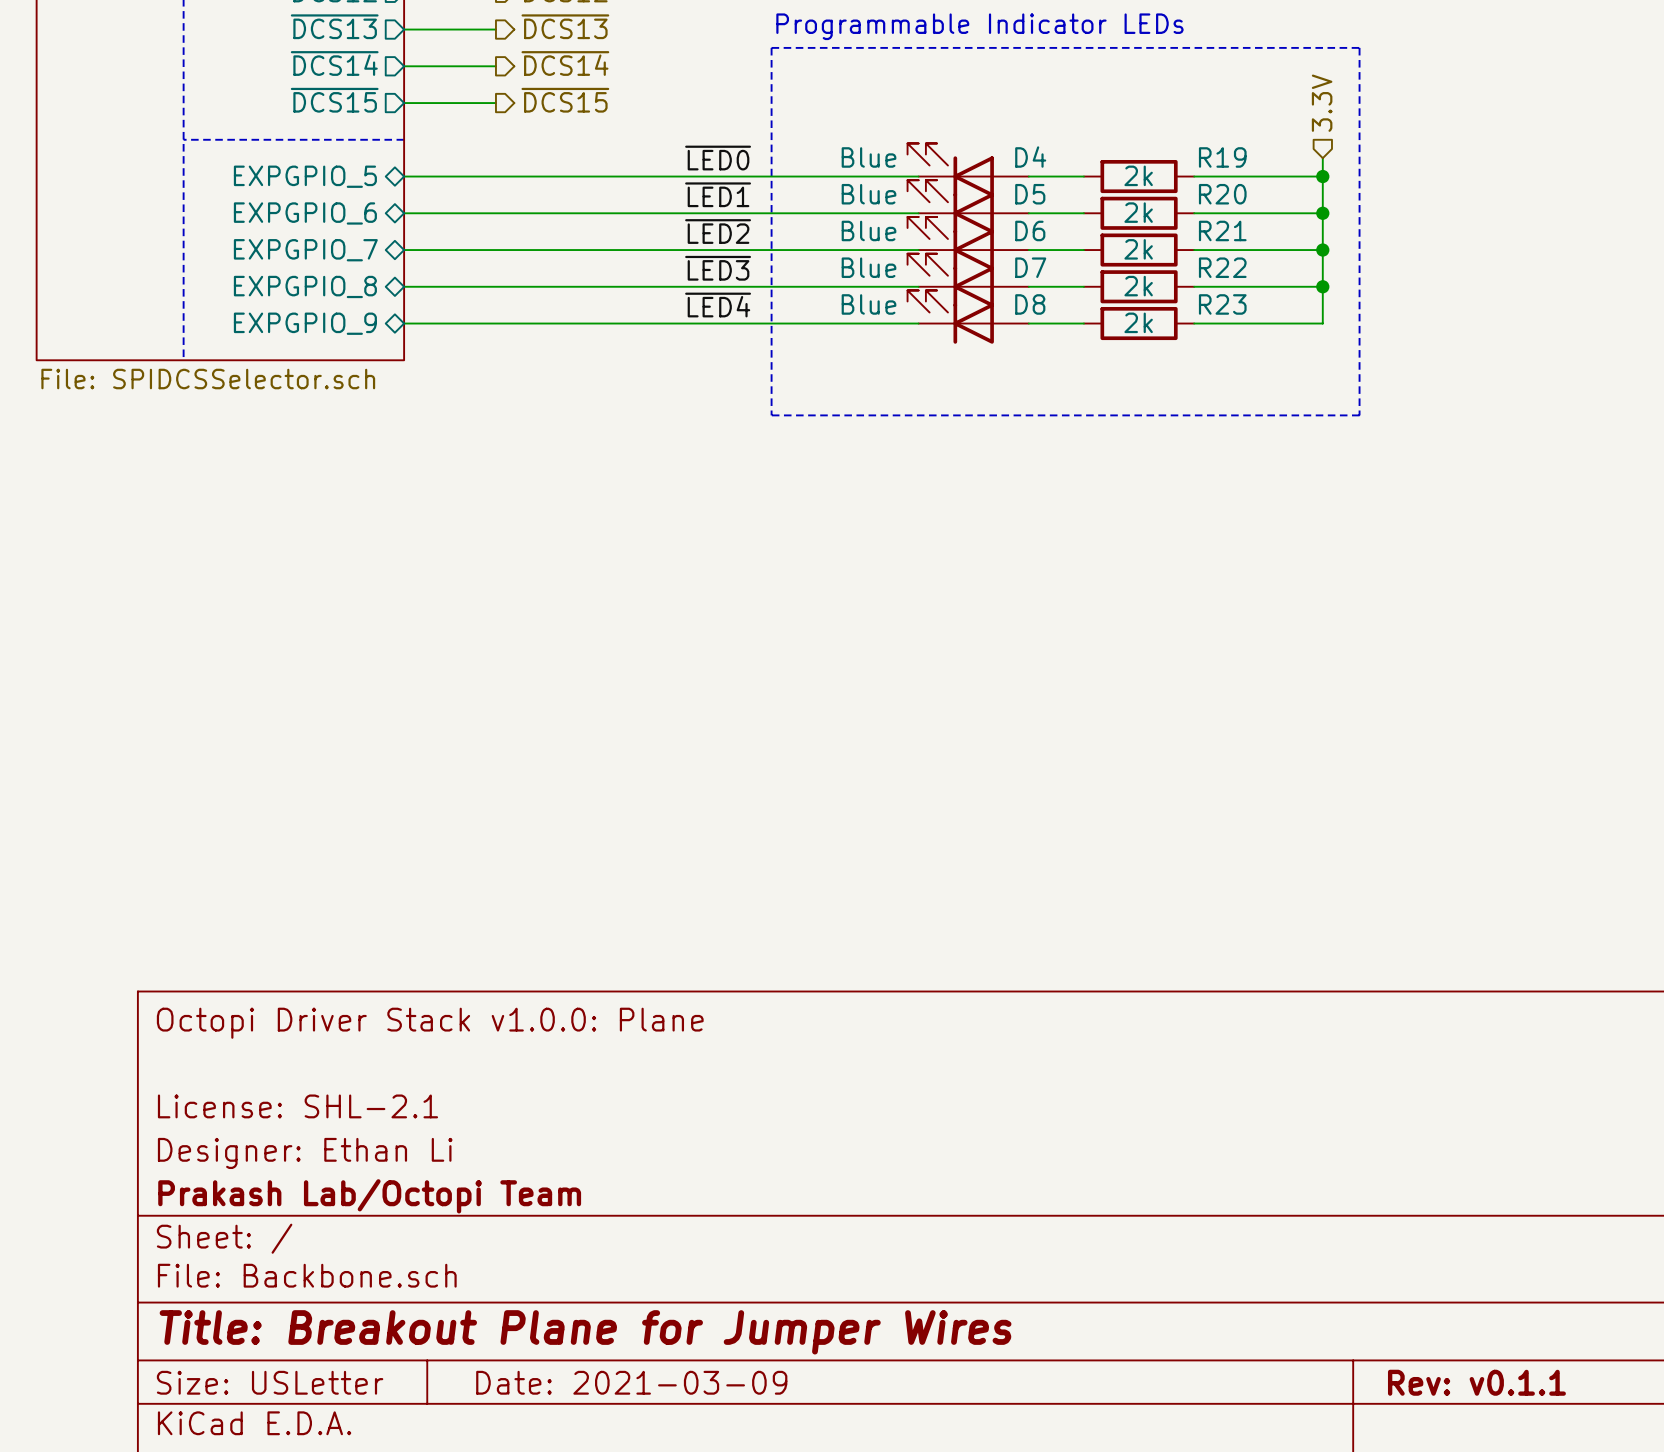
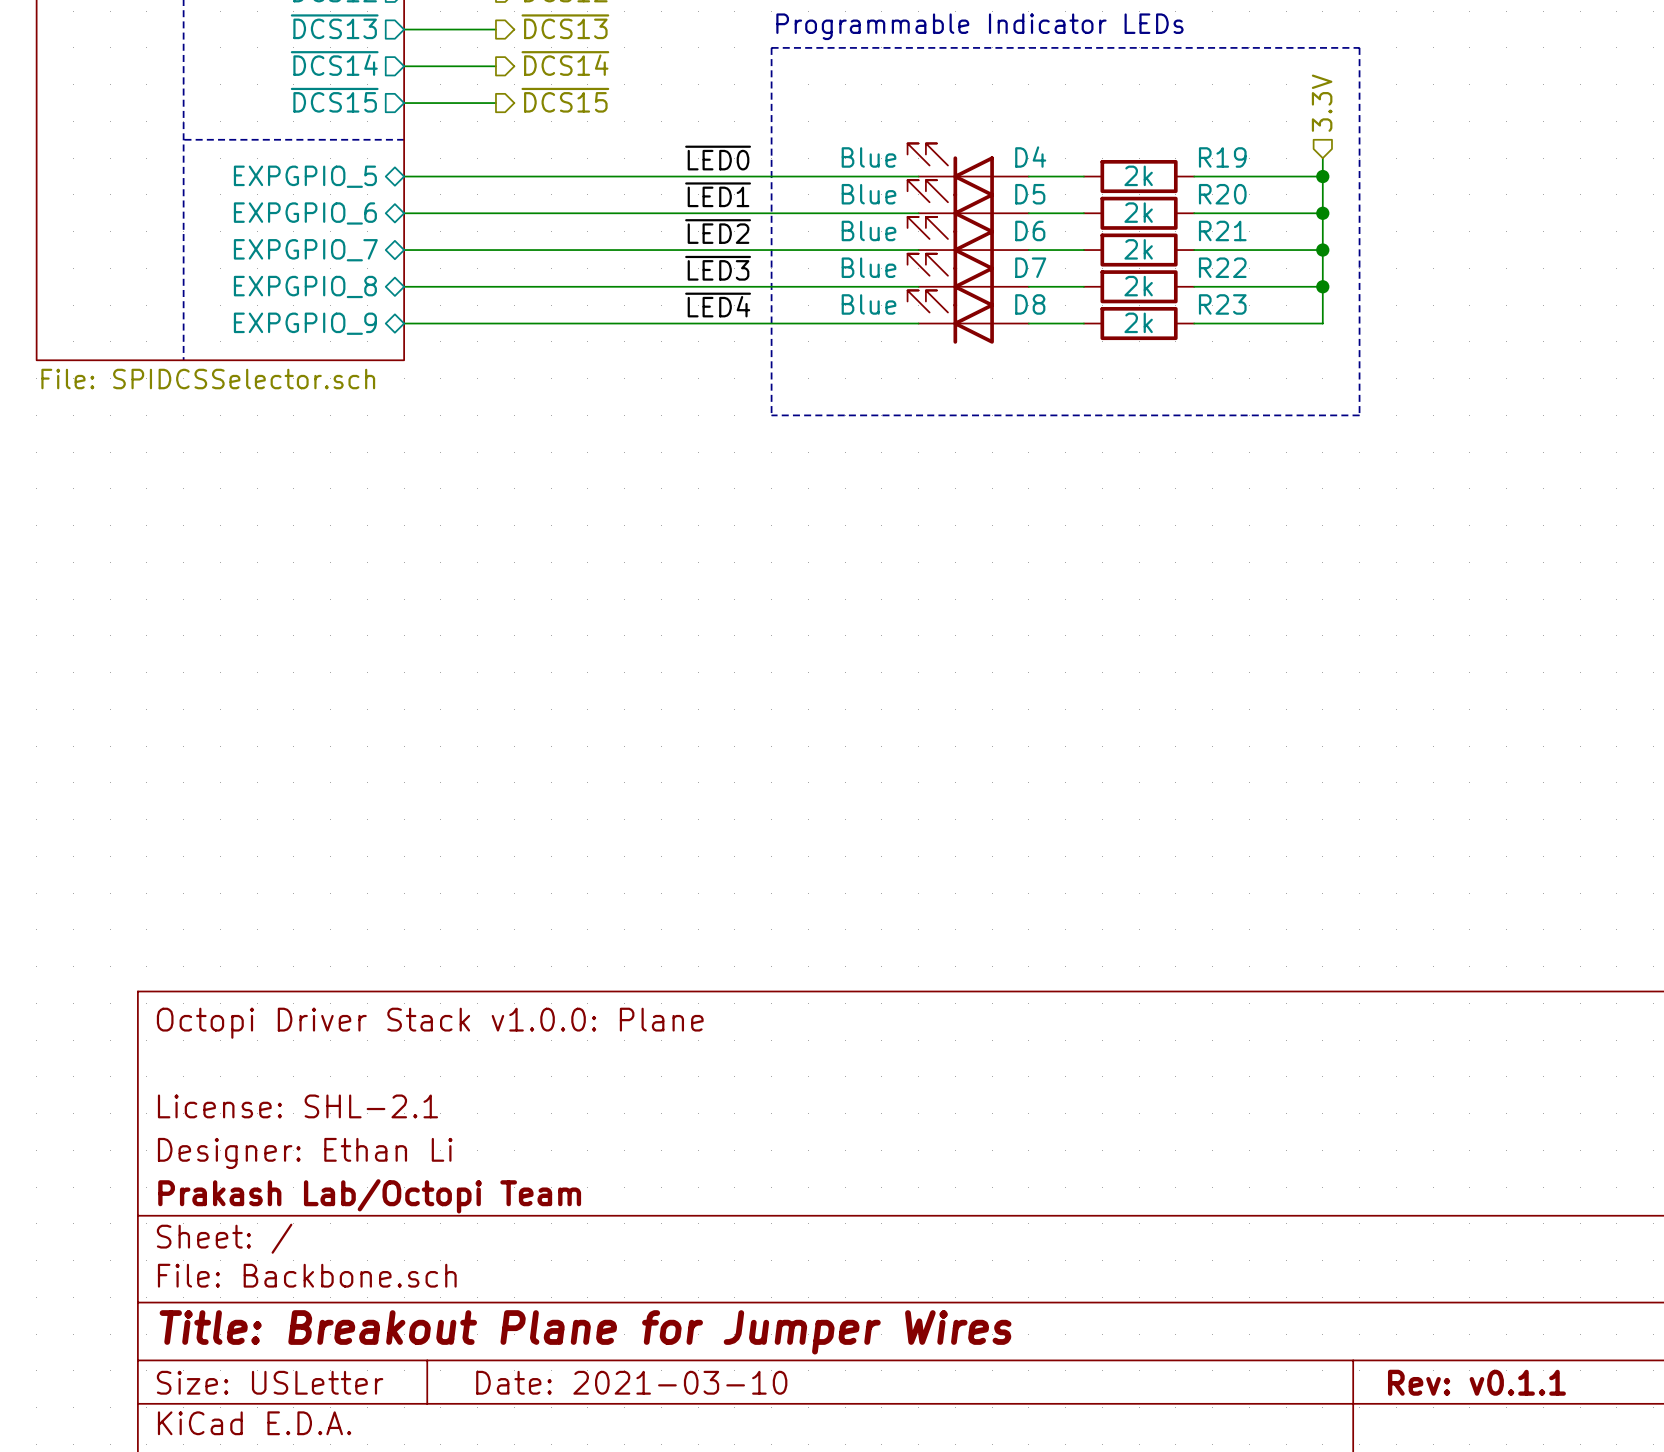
title block: Date: 2021-03-09 (631, 1382) -> Date: 2021-03-10 (631, 1382)

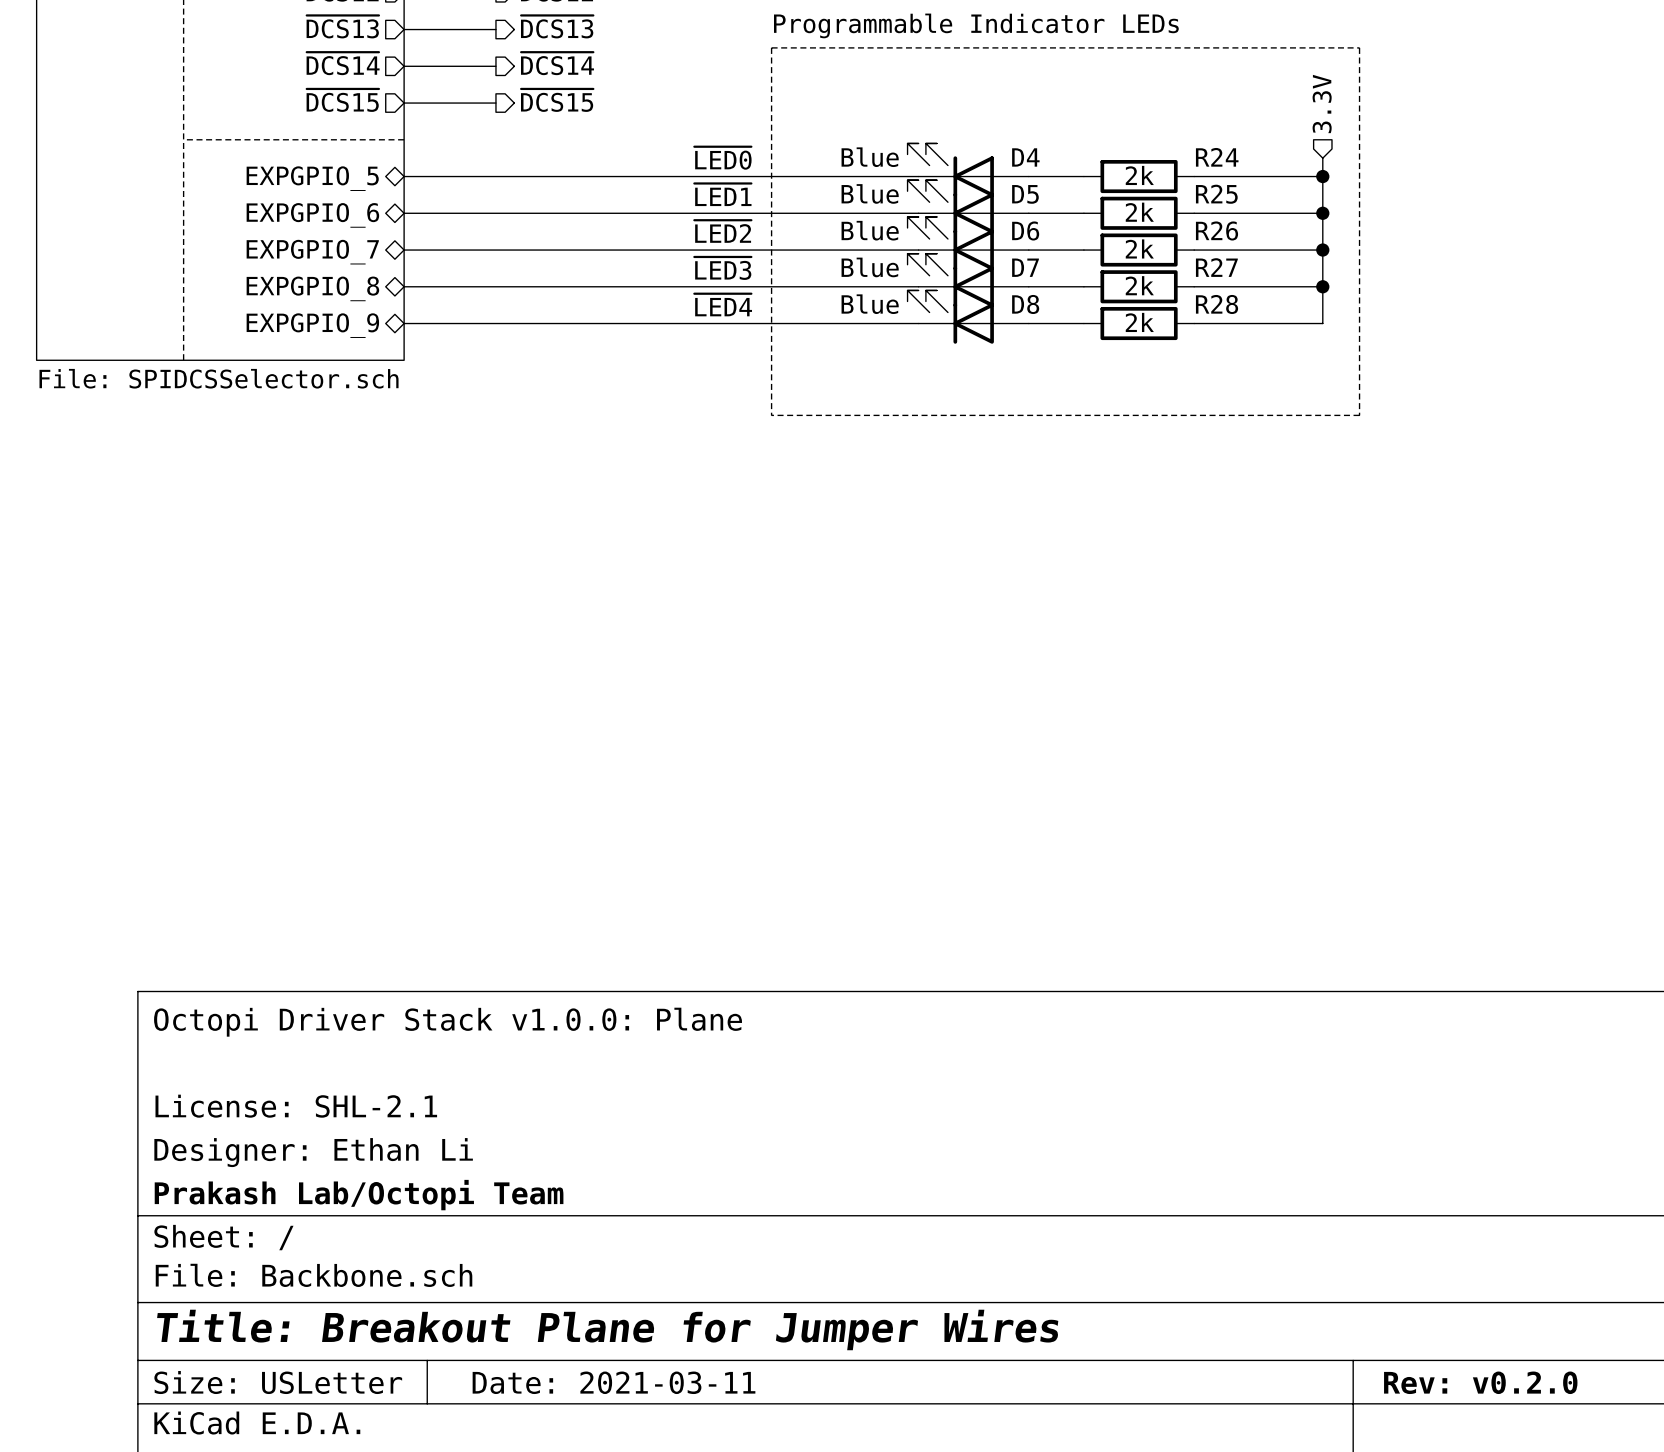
R19 name: R19 (1222, 157) -> R24 (1217, 157)
R20 name: R20 (1222, 194) -> R25 (1216, 194)
R21 name: R21 (1222, 230) -> R26 (1217, 230)
R22 name: R22 (1222, 267) -> R27 (1216, 267)
R23 name: R23 (1222, 304) -> R28 (1217, 304)
title block: Date: 2021-03-10 (631, 1382) -> Date: 2021-03-11 (614, 1382)
title block: Rev: v0.1.1 (1476, 1382) -> Rev: v0.2.0 (1480, 1382)

